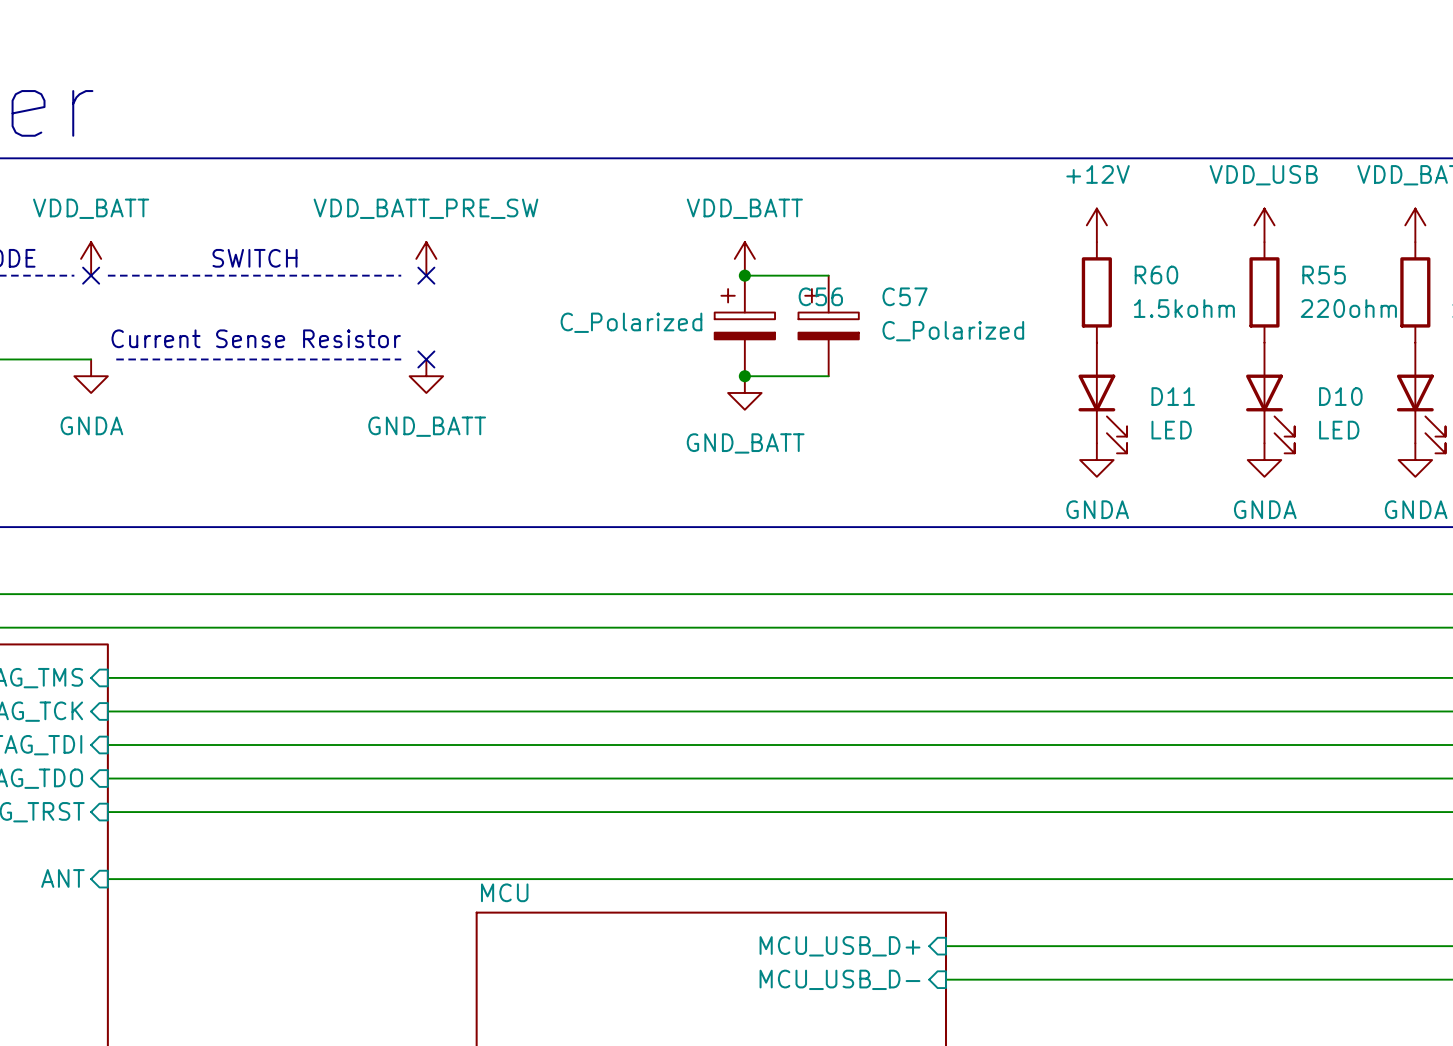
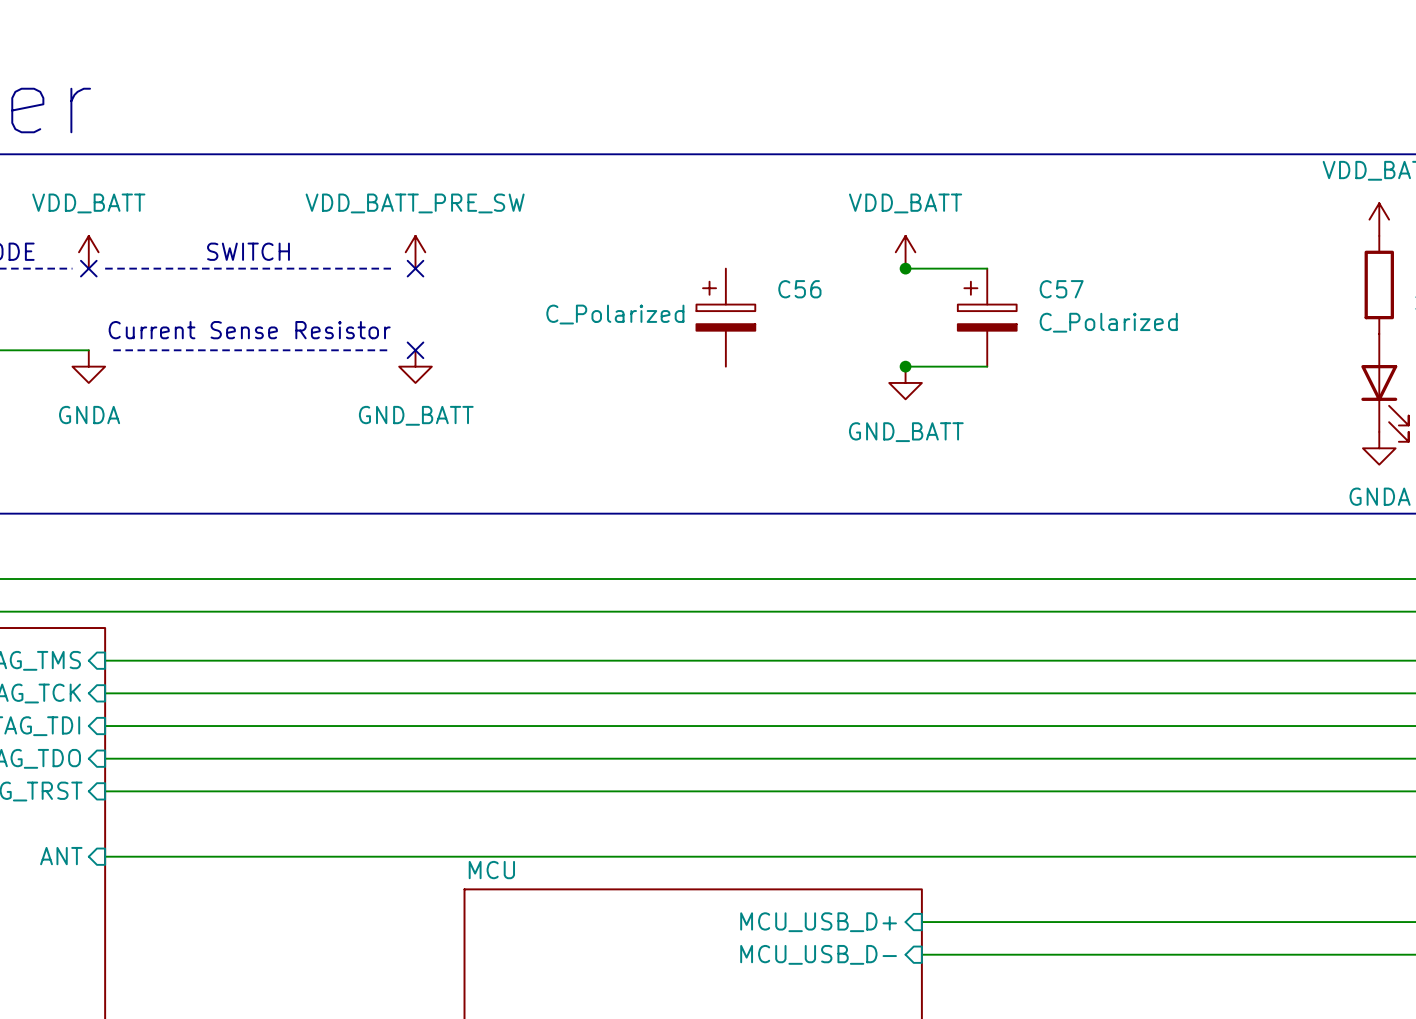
power symbol: +12V (1096, 225) -> none
power symbol: VDD_USB (1264, 225) -> none
power symbol position: VDD_BATT (744, 258) -> VDD_BATT (905, 252)
wire: (744, 275) (828, 275) -> (905, 268) (987, 268)
junction: (744, 275) -> none
junction: none -> (905, 268)
R60: 1.5kohm (1096, 292) -> none
R55: 220ohm (1264, 292) -> none
C57 position: (828, 325) -> (987, 317)
wire: (744, 376) (828, 376) -> (905, 366) (987, 366)
junction: (744, 376) -> none
junction: none -> (905, 366)
power symbol position: GND_BATT (744, 392) -> GND_BATT (905, 382)
D11: LED (1102, 398) -> none
D10: LED (1270, 398) -> none
power symbol: GNDA (1096, 460) -> none
power symbol: GNDA (1264, 460) -> none

